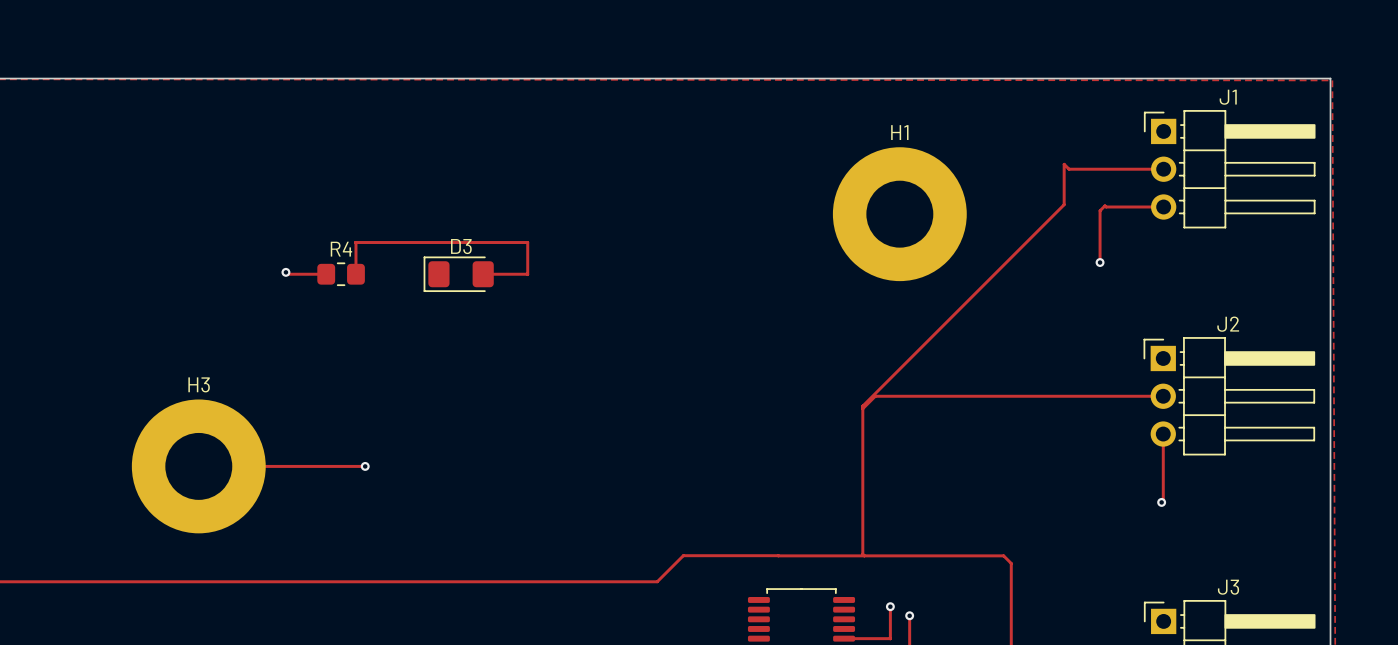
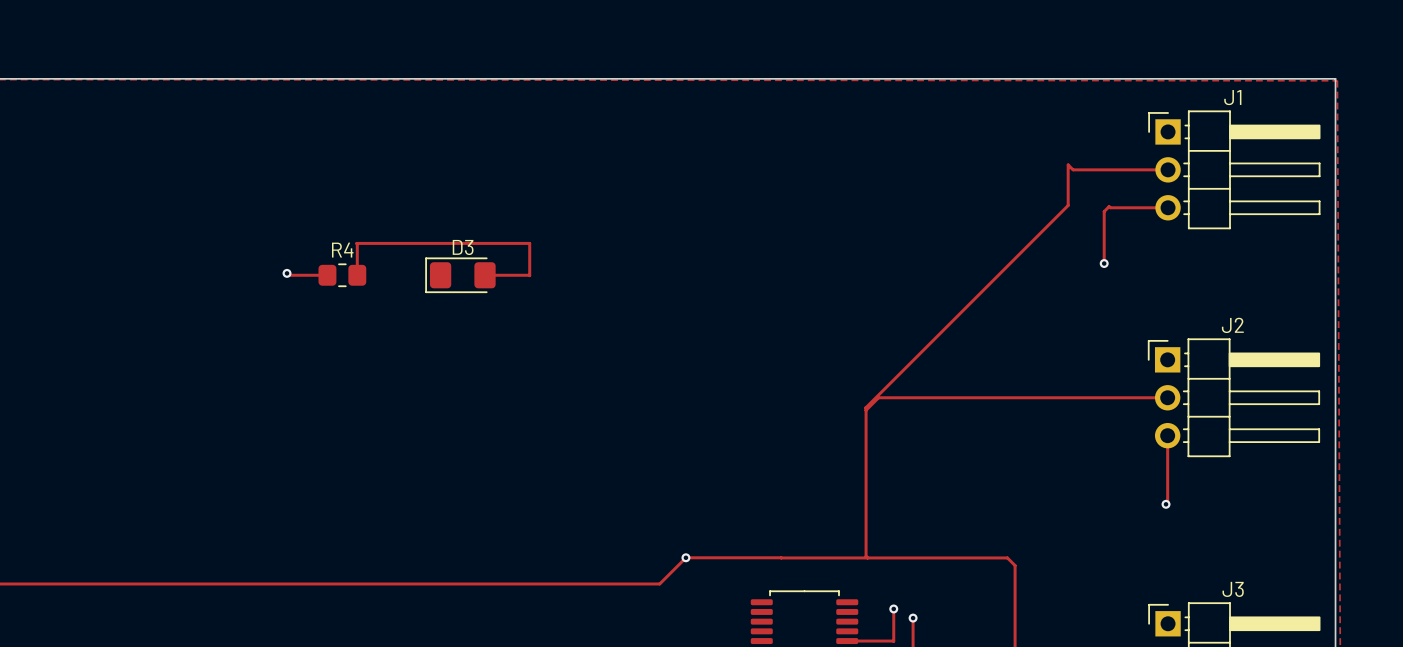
H1: (899, 214) -> none
track: (198, 466) (366, 466) -> none
H3: (198, 466) -> none
via: (365, 466) -> none
via: none -> (685, 557)

